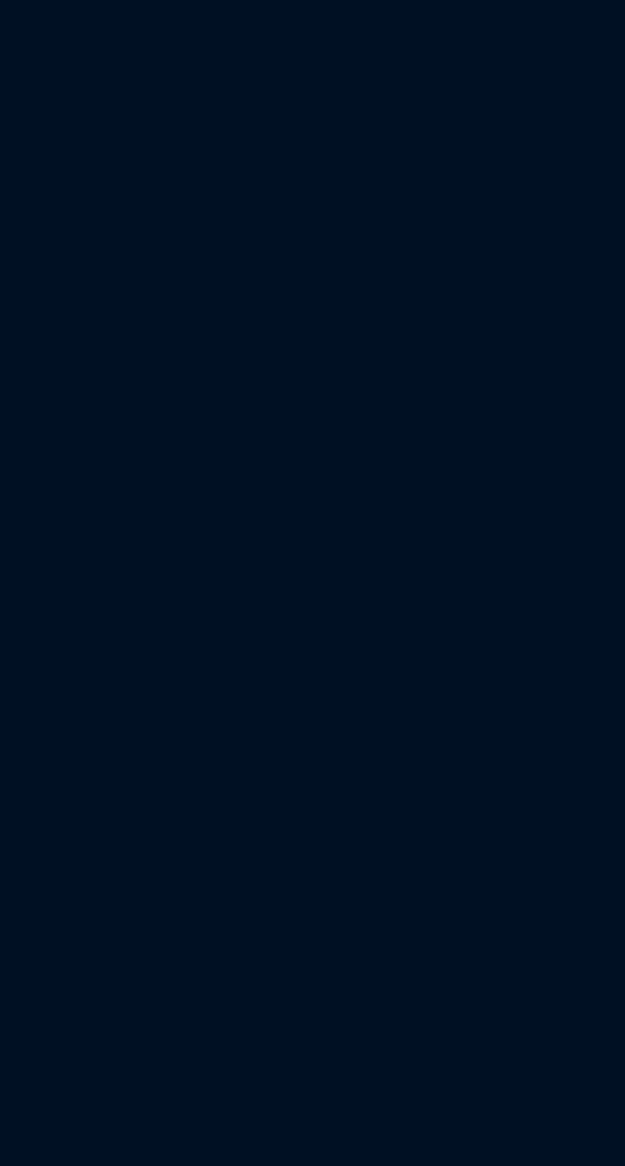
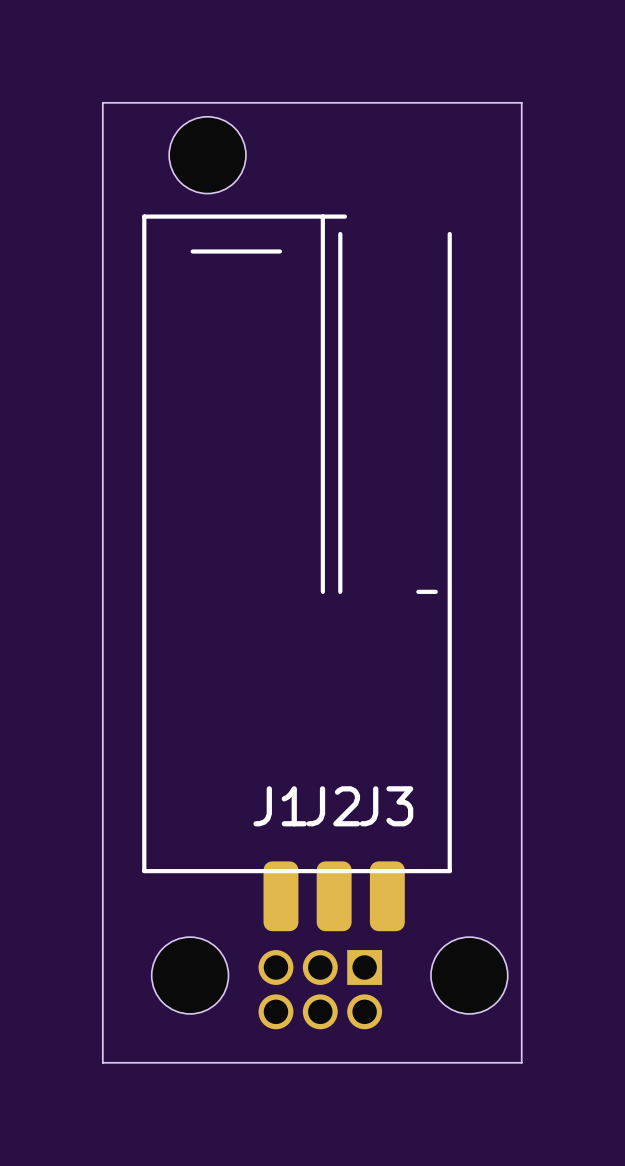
board edge: none -> (521, 102) (521, 1062) (102, 1062) (102, 102) (521, 102)
part: none -> (207, 155)
line: none -> (322, 216) (322, 591)
line: none -> (345, 216) (144, 216) (144, 871) (449, 871) (449, 234)
line: none -> (340, 234) (340, 591)
line: none -> (279, 251) (192, 251)
line: none -> (435, 591) (418, 591)
J1: none -> (280, 896)
J2: none -> (334, 896)
J3: none -> (387, 896)
part: none -> (190, 975)
part: none -> (469, 975)
part: none -> (320, 989)

